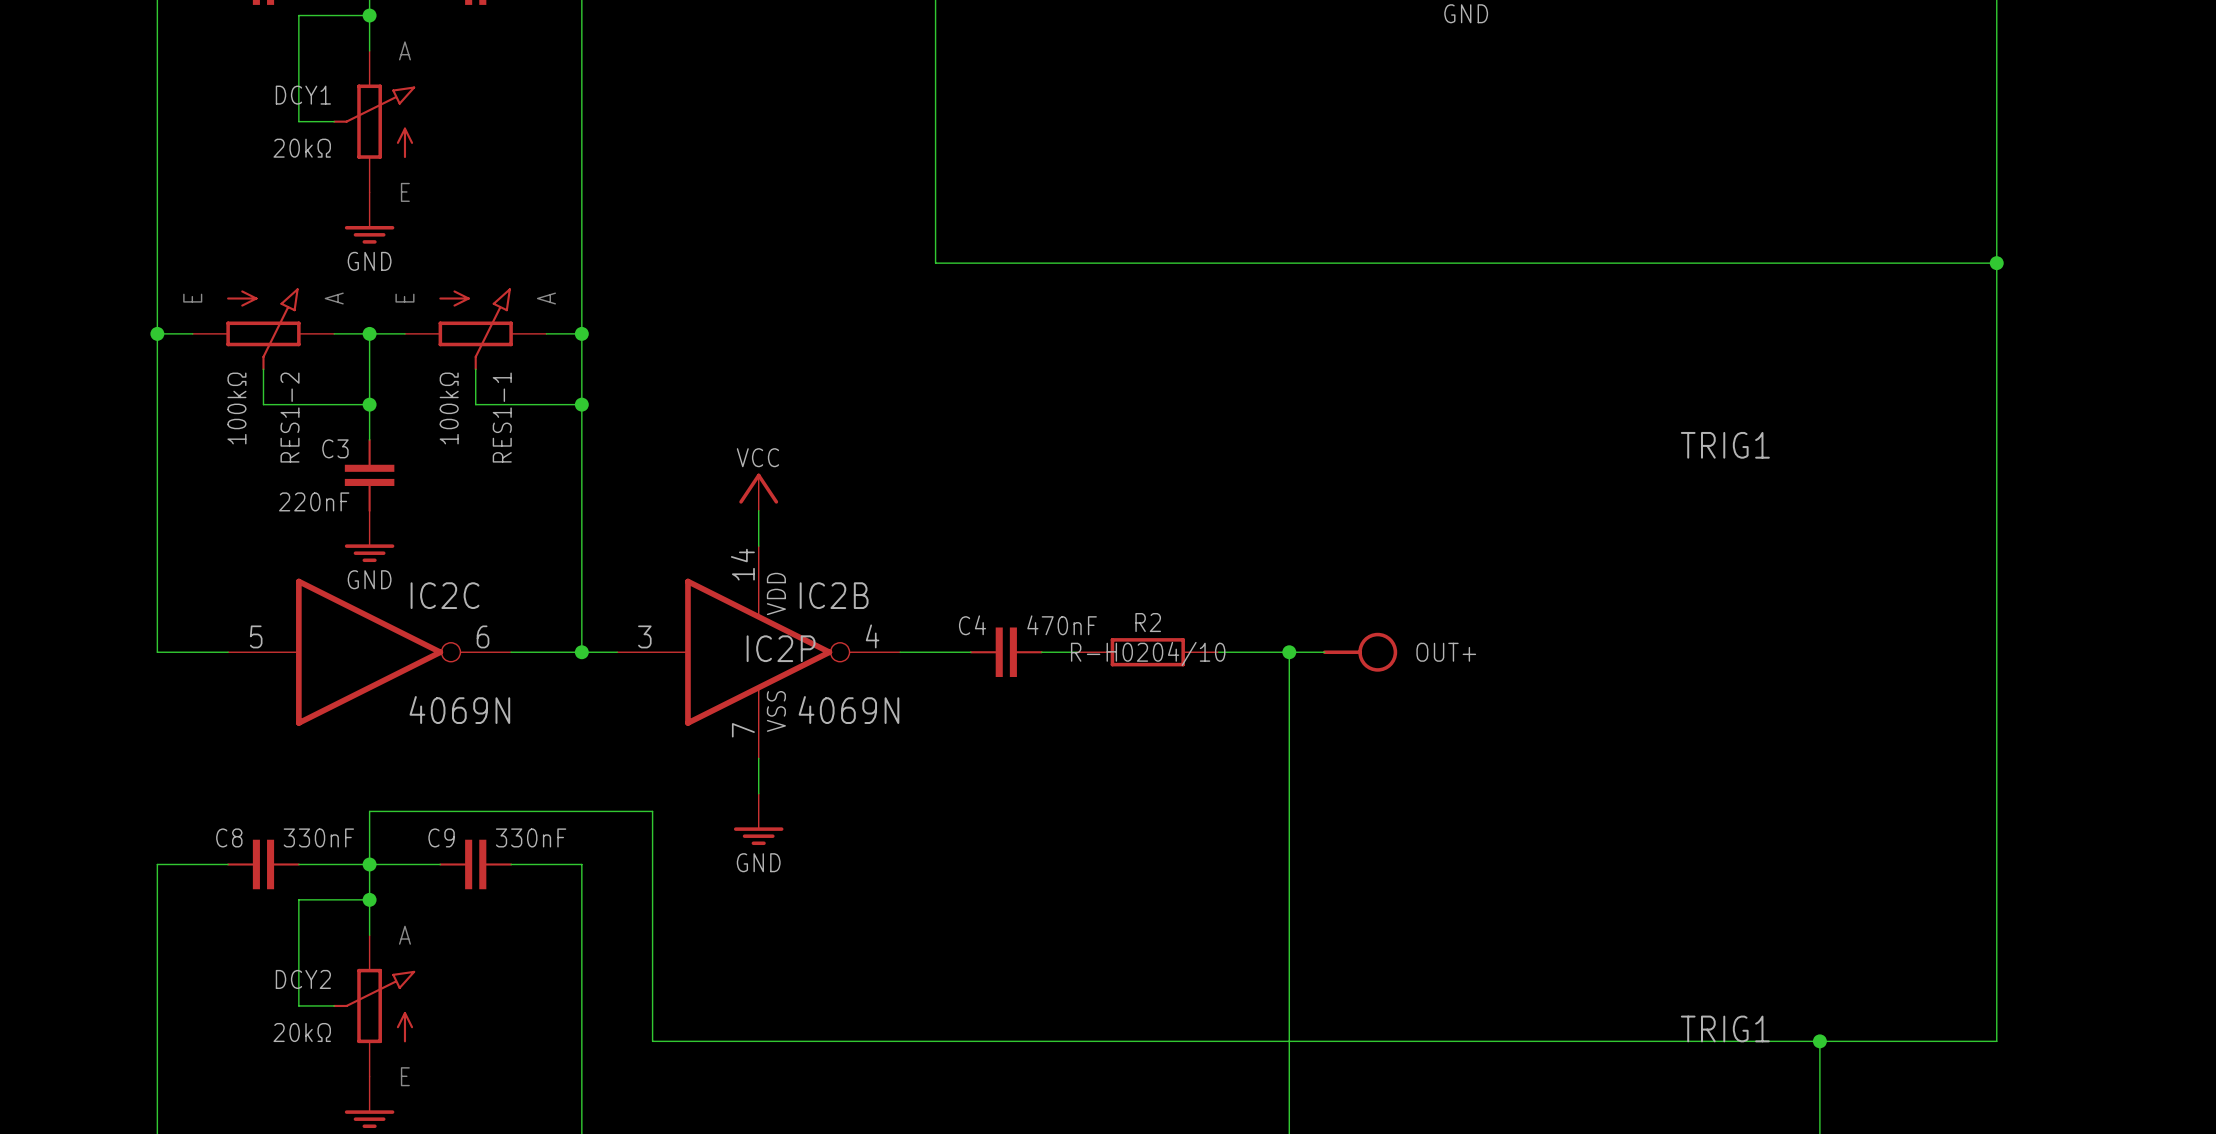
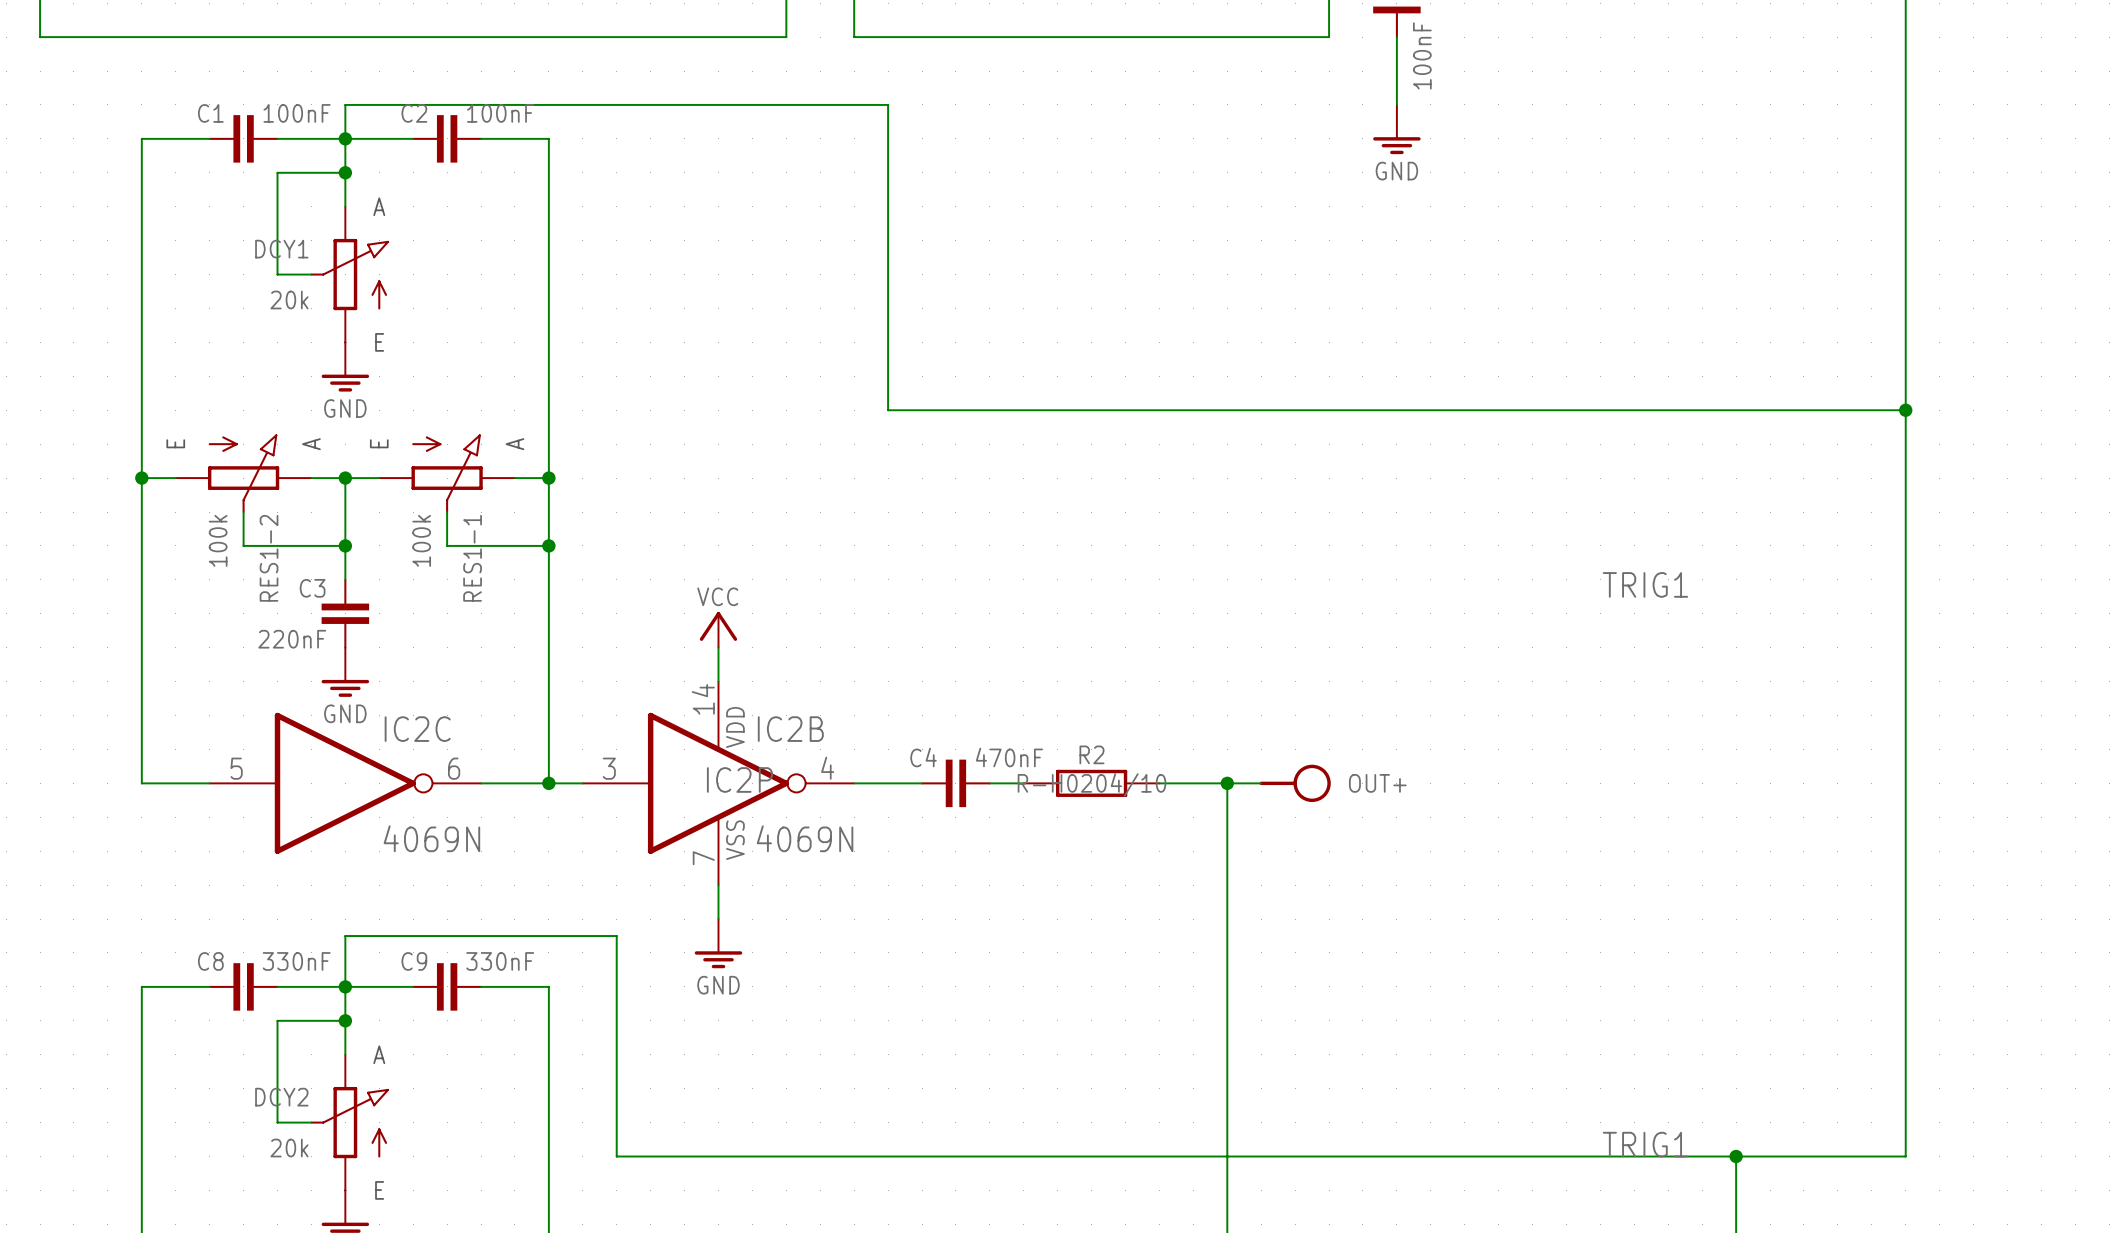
DCY1 value: 20kΩ (302, 148) -> 20k (289, 299)
RES1-2 value: 100kΩ (236, 408) -> 100k (218, 540)
RES1-1 value: 100kΩ (449, 408) -> 100k (421, 540)
DCY2 value: 20kΩ (302, 1032) -> 20k (289, 1148)

